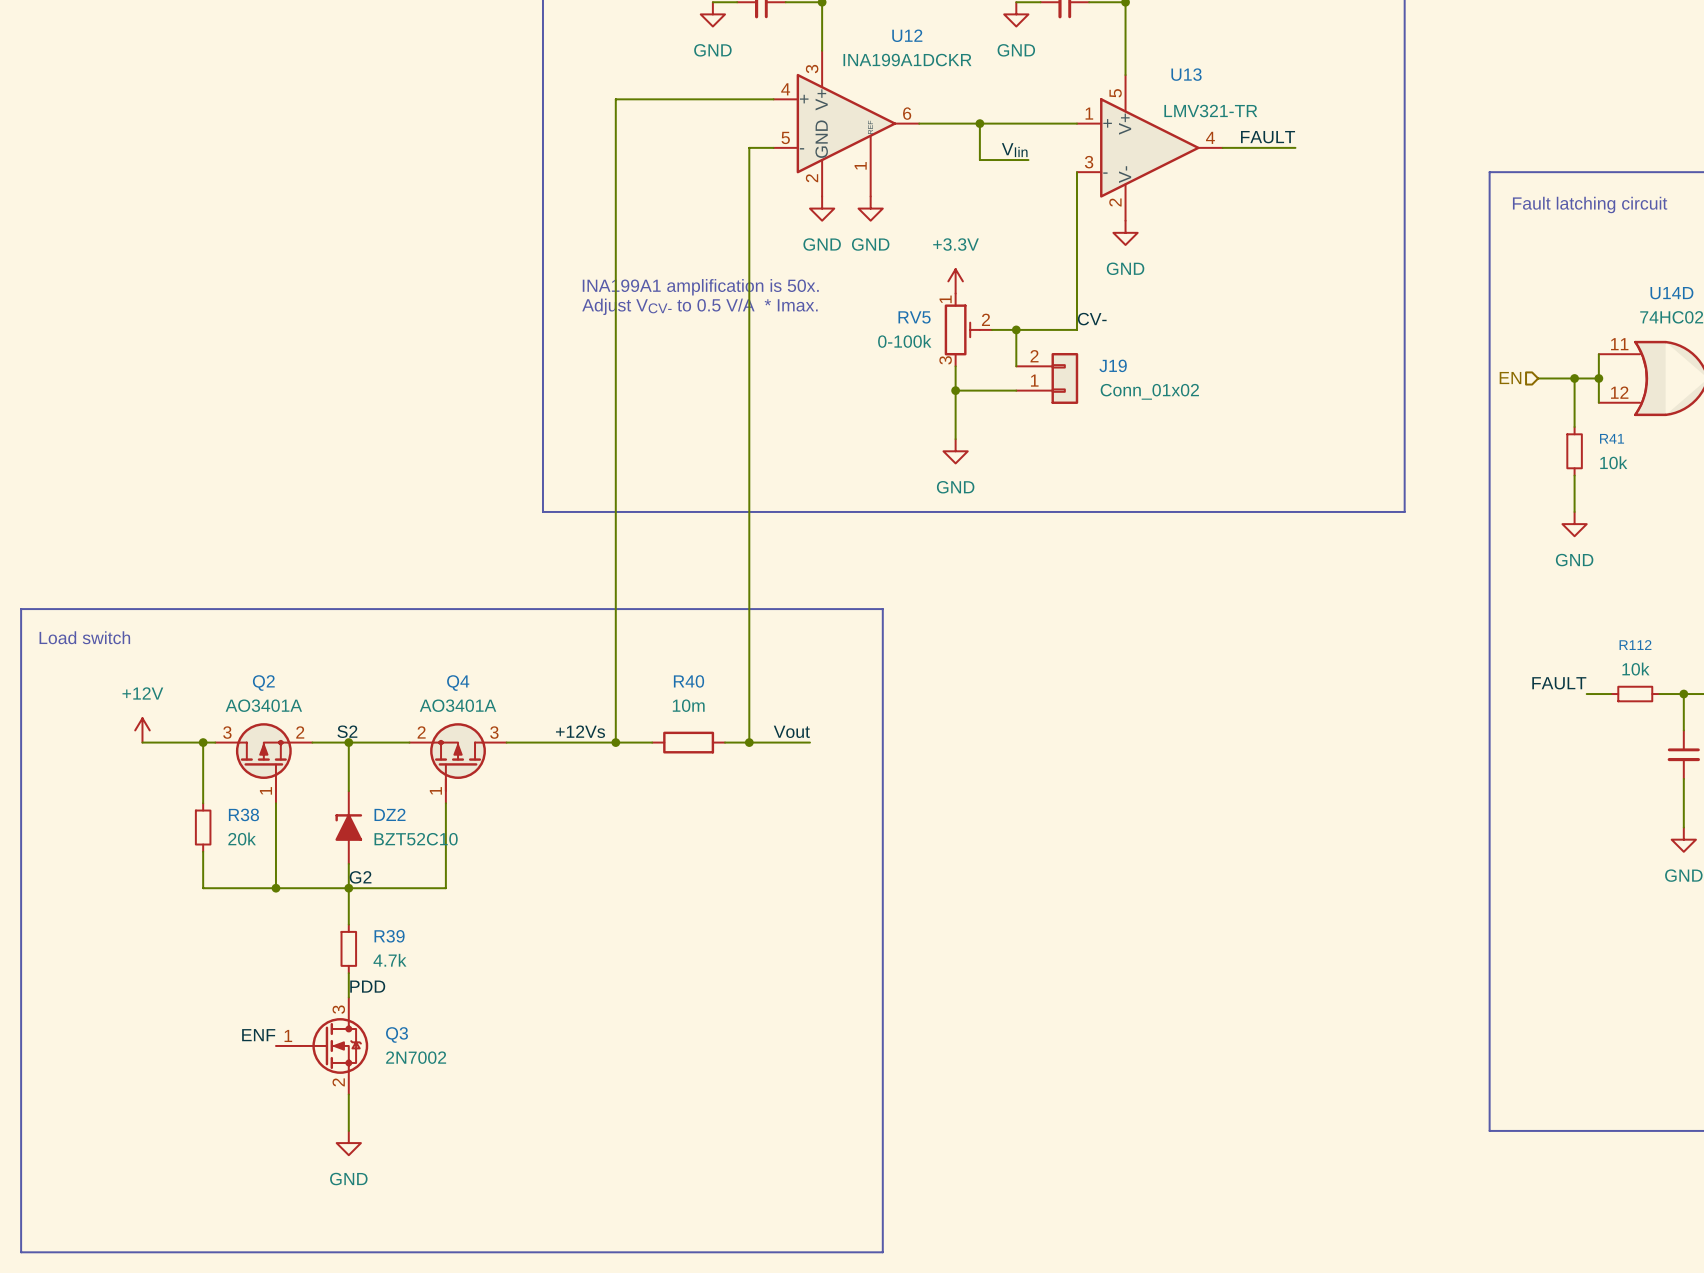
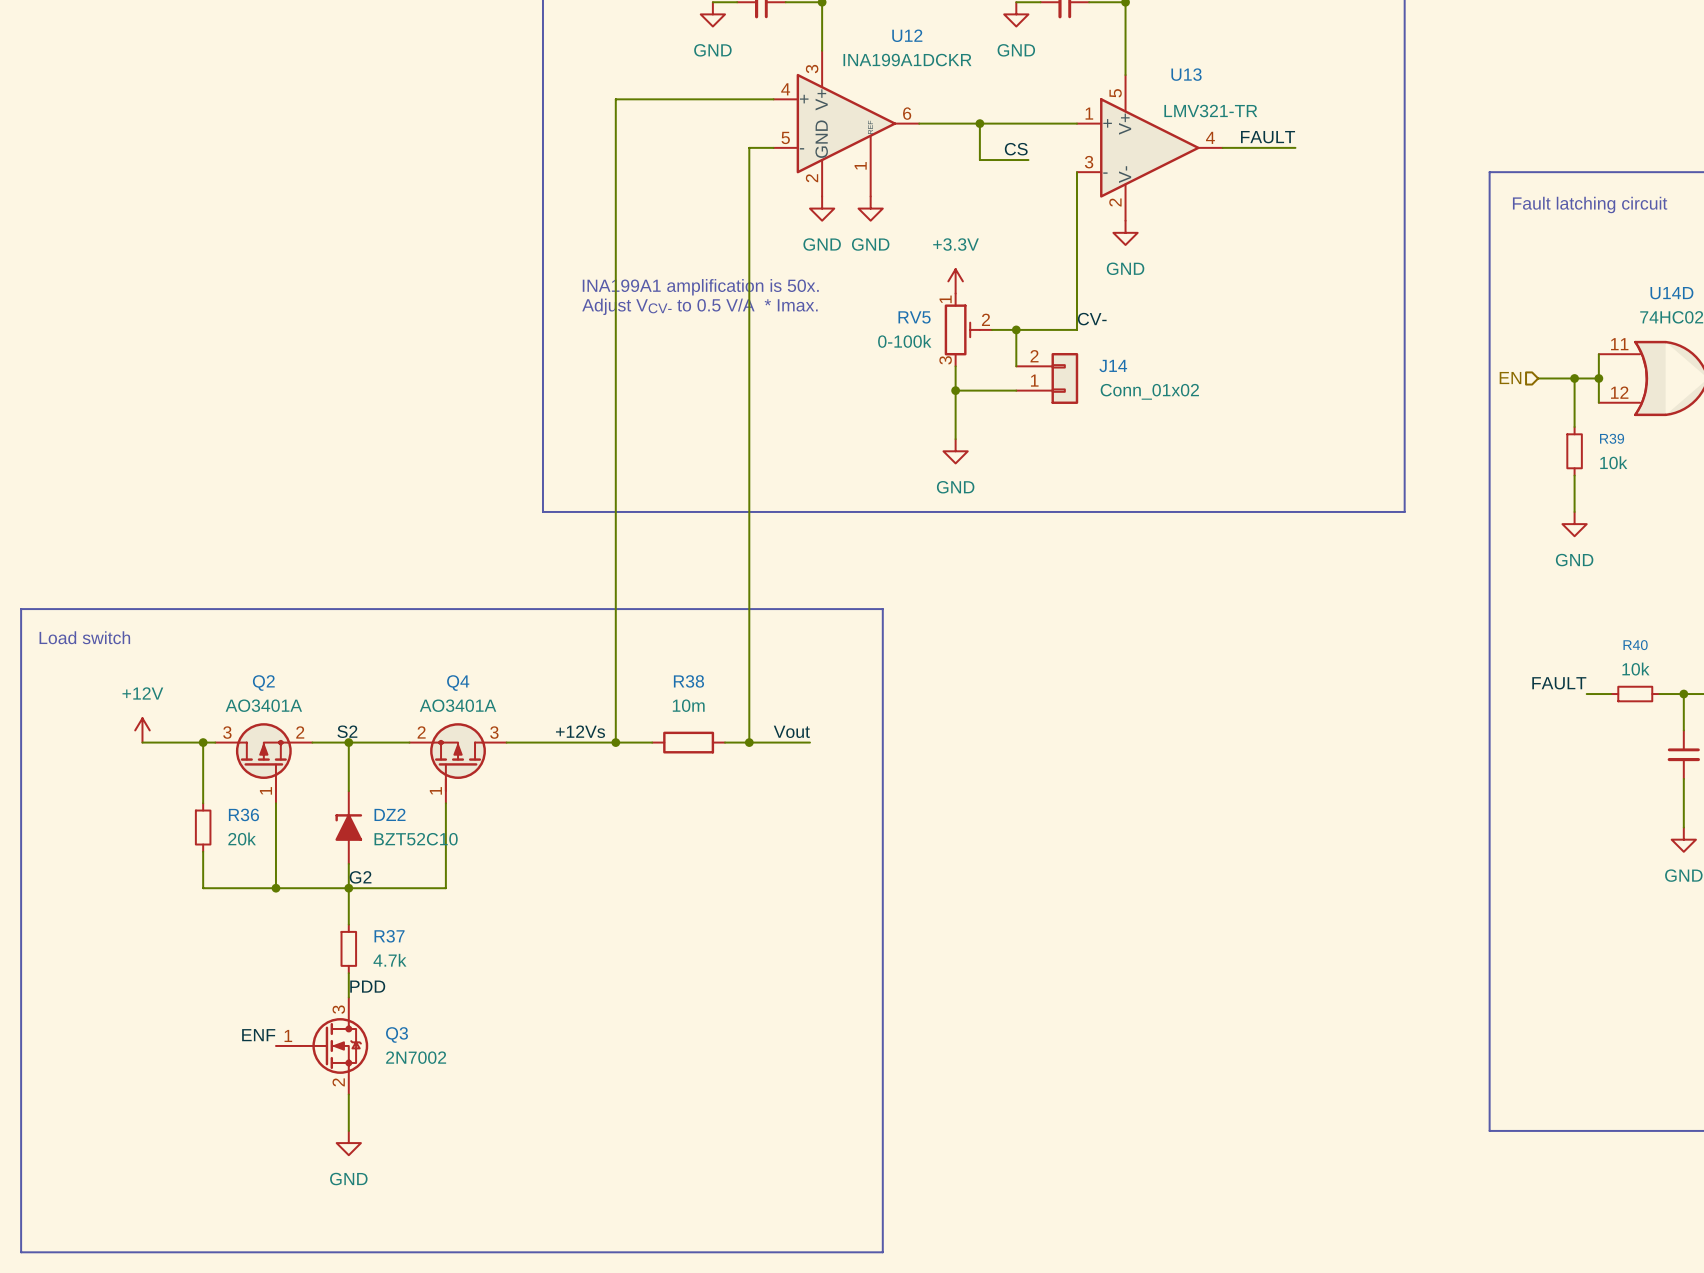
label: VIin (1014, 150) -> CS (1016, 149)
J19 name: J19 (1113, 365) -> J14 (1113, 365)
R41 name: R41 (1612, 438) -> R39 (1612, 438)
R112 name: R112 (1635, 645) -> R40 (1635, 645)
R40 name: R40 (689, 681) -> R38 (688, 681)
R38 name: R38 (243, 814) -> R36 (243, 814)
R39 name: R39 (389, 936) -> R37 (389, 936)

